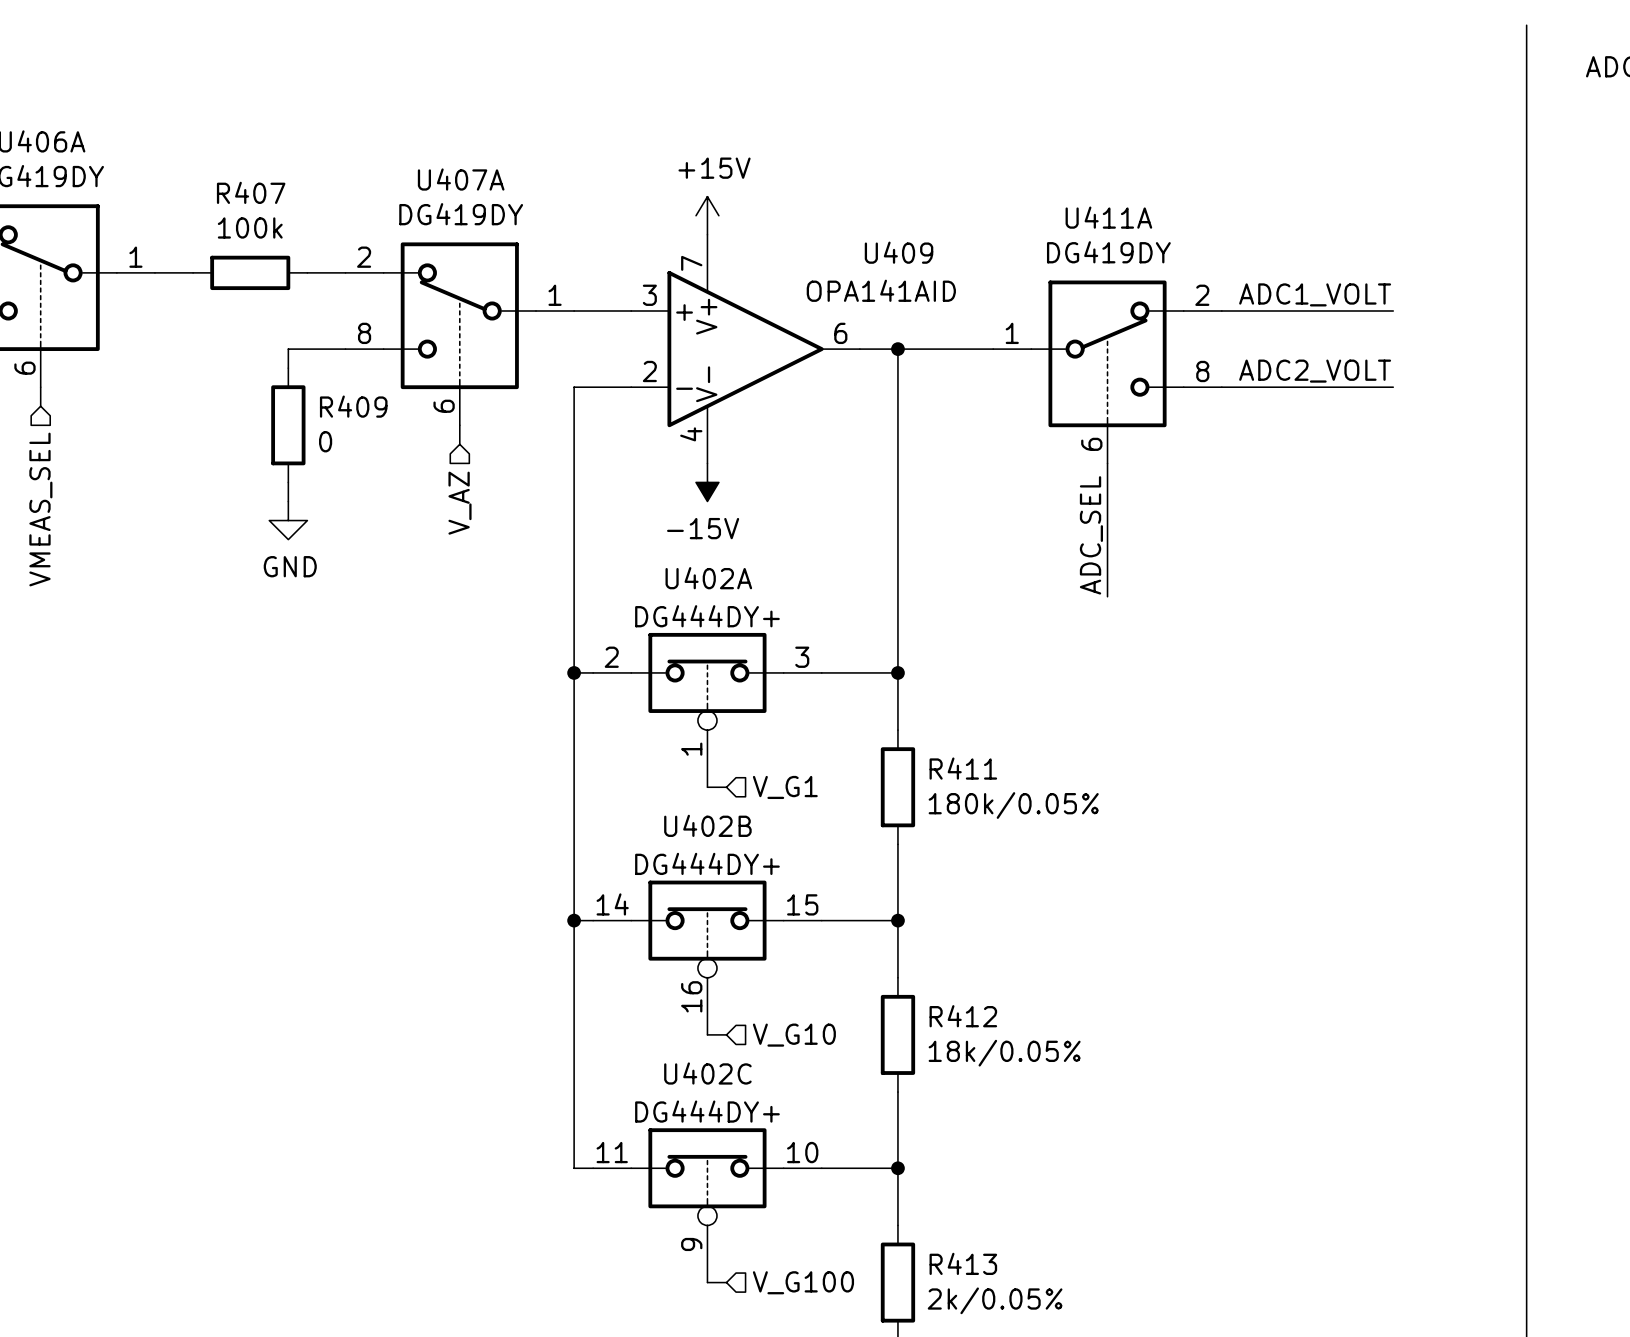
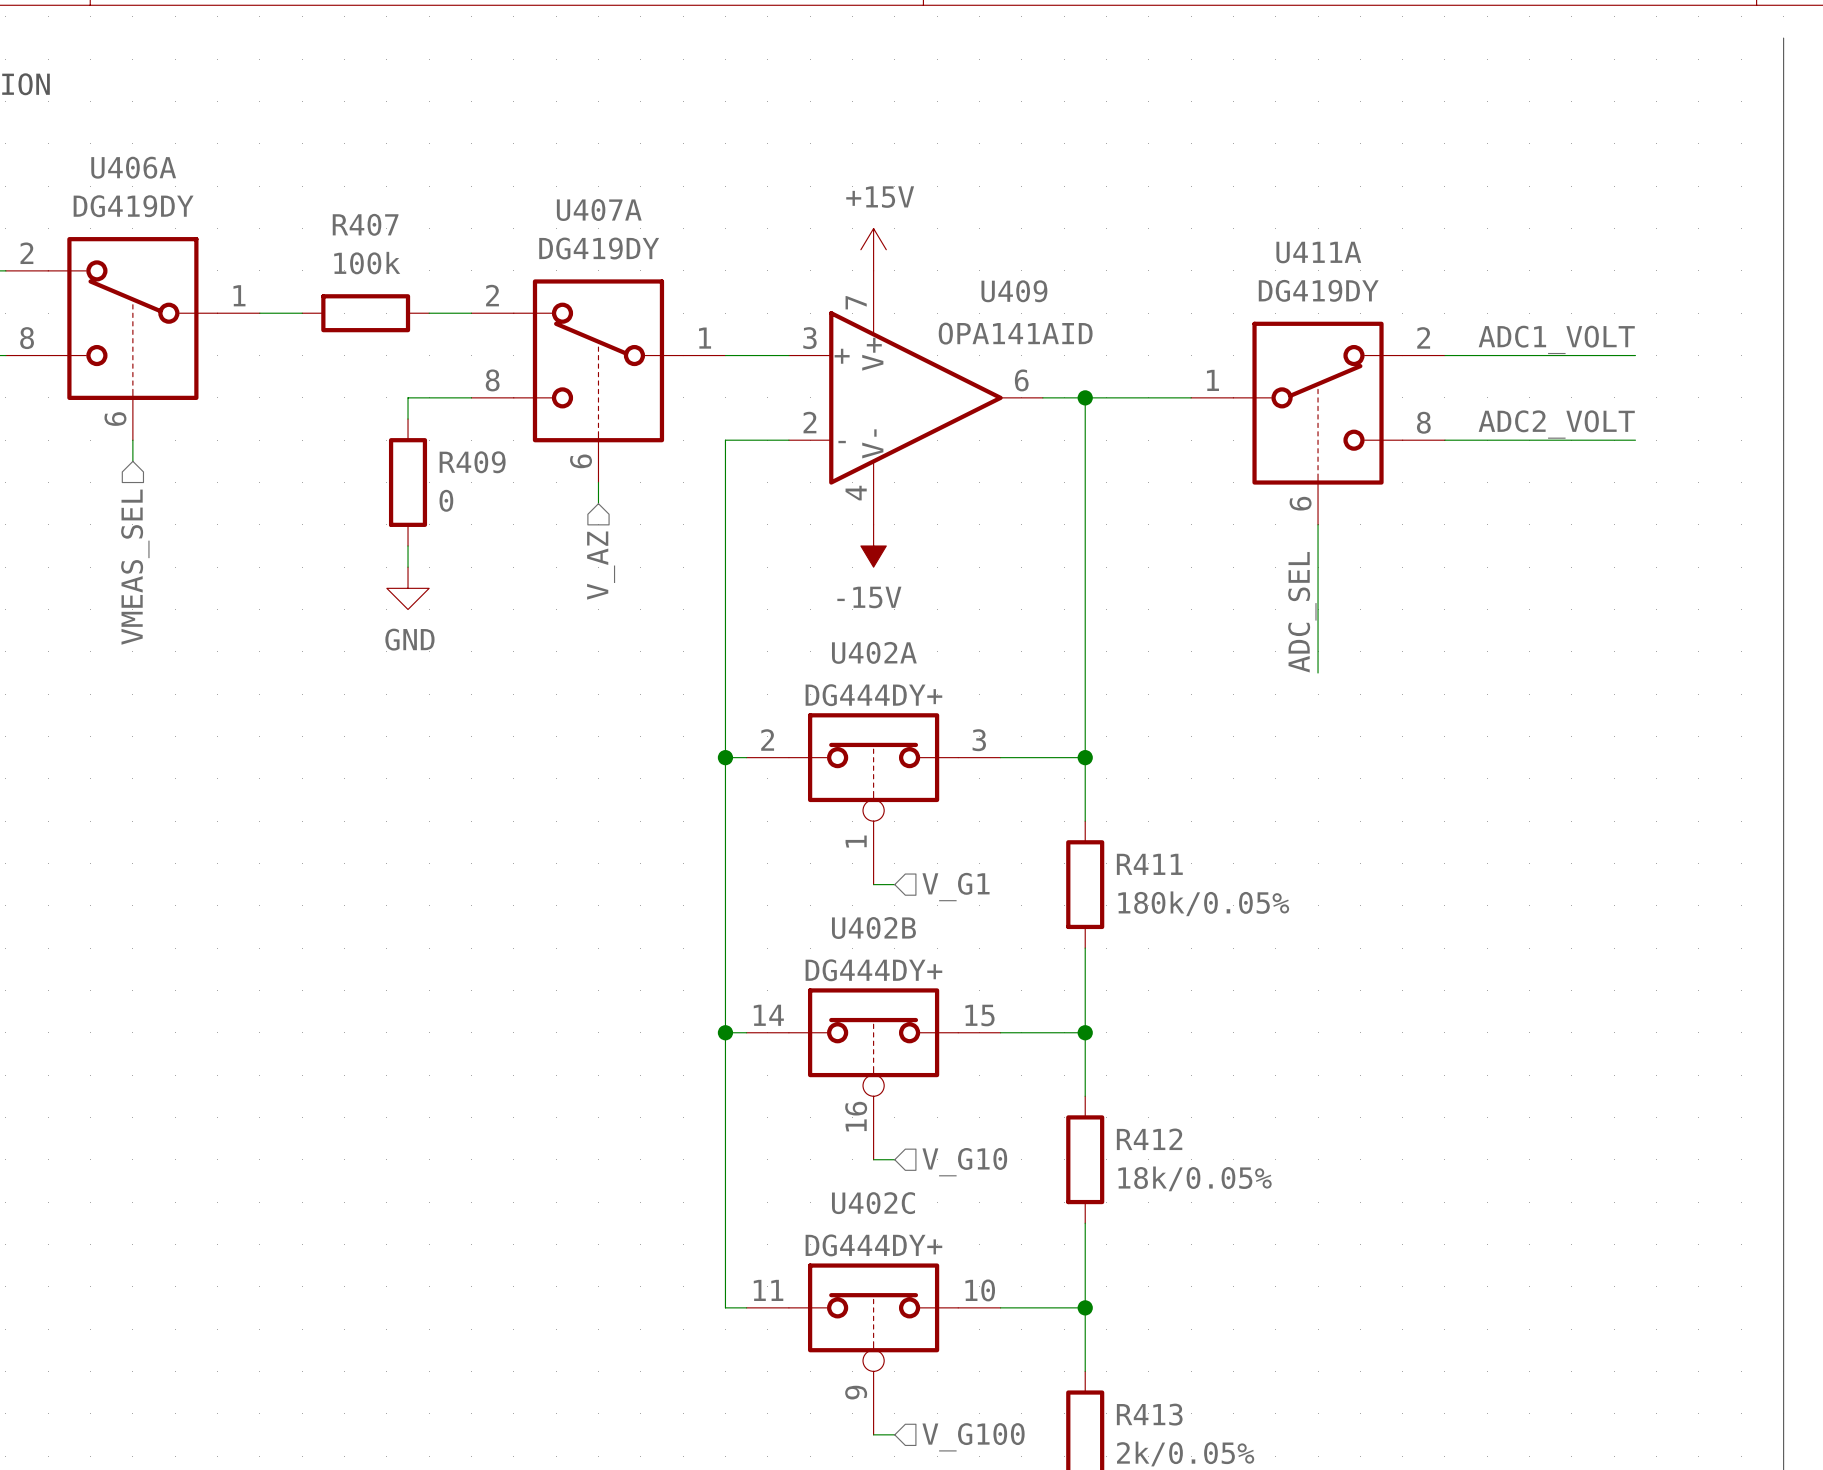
U409 name position: U409 (899, 252) -> U409 (1014, 291)
U409 value position: OPA141AID (881, 290) -> OPA141AID (1015, 333)

